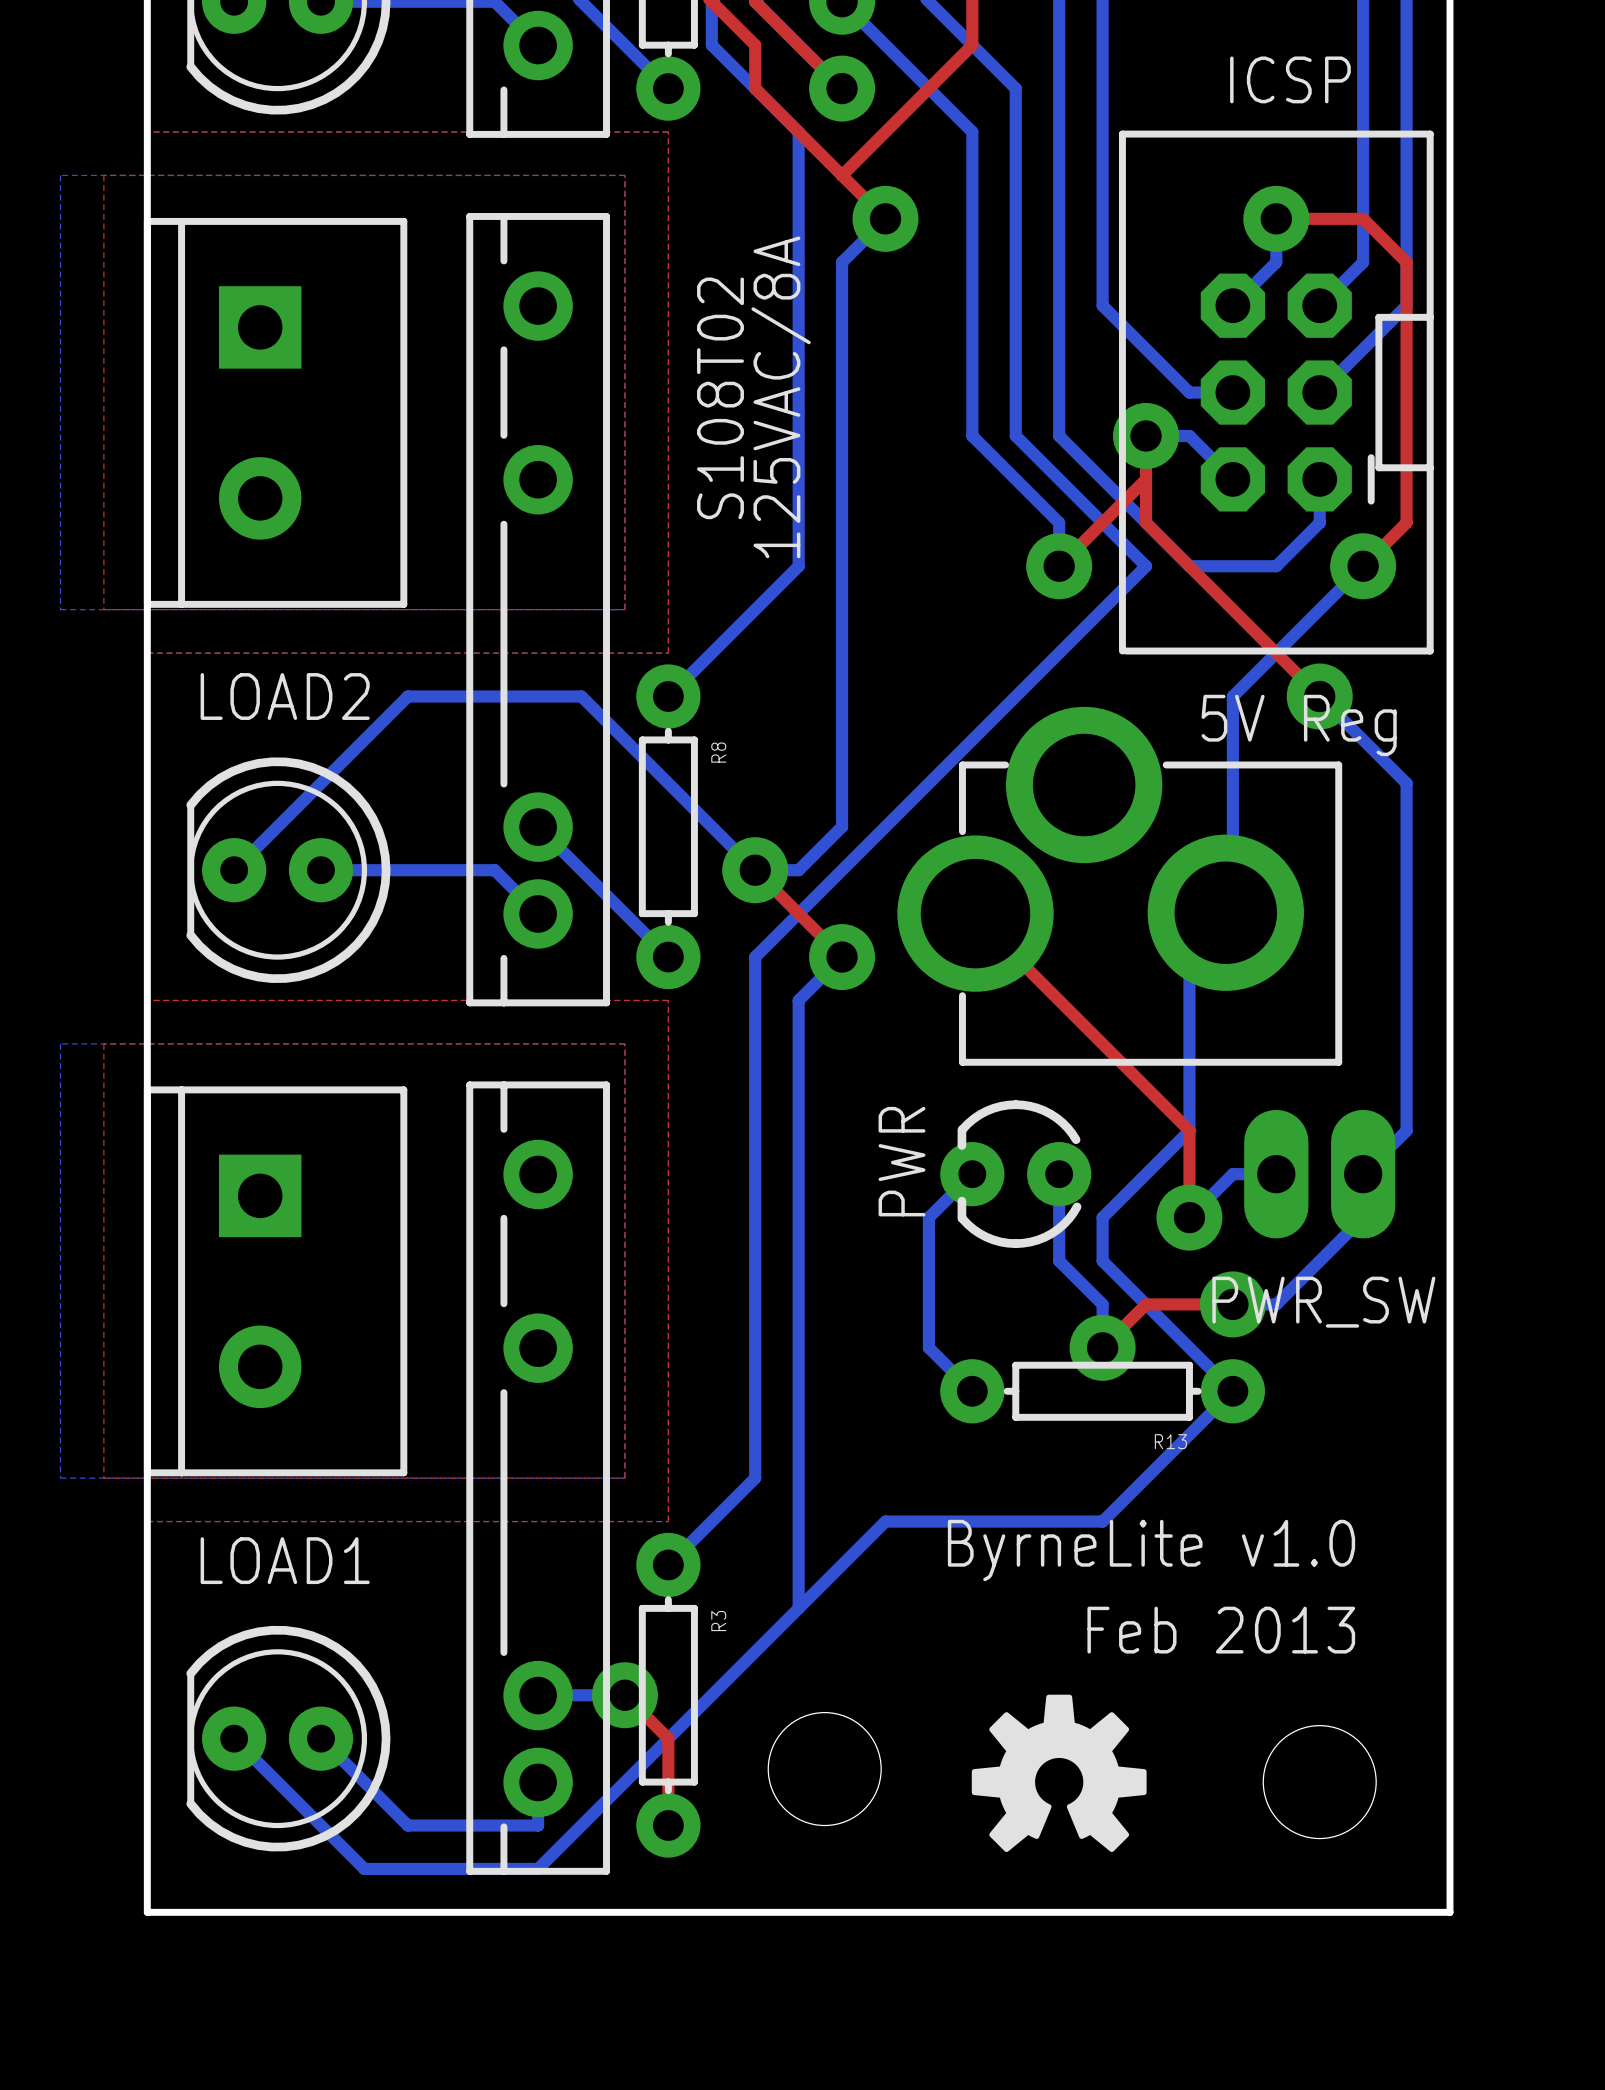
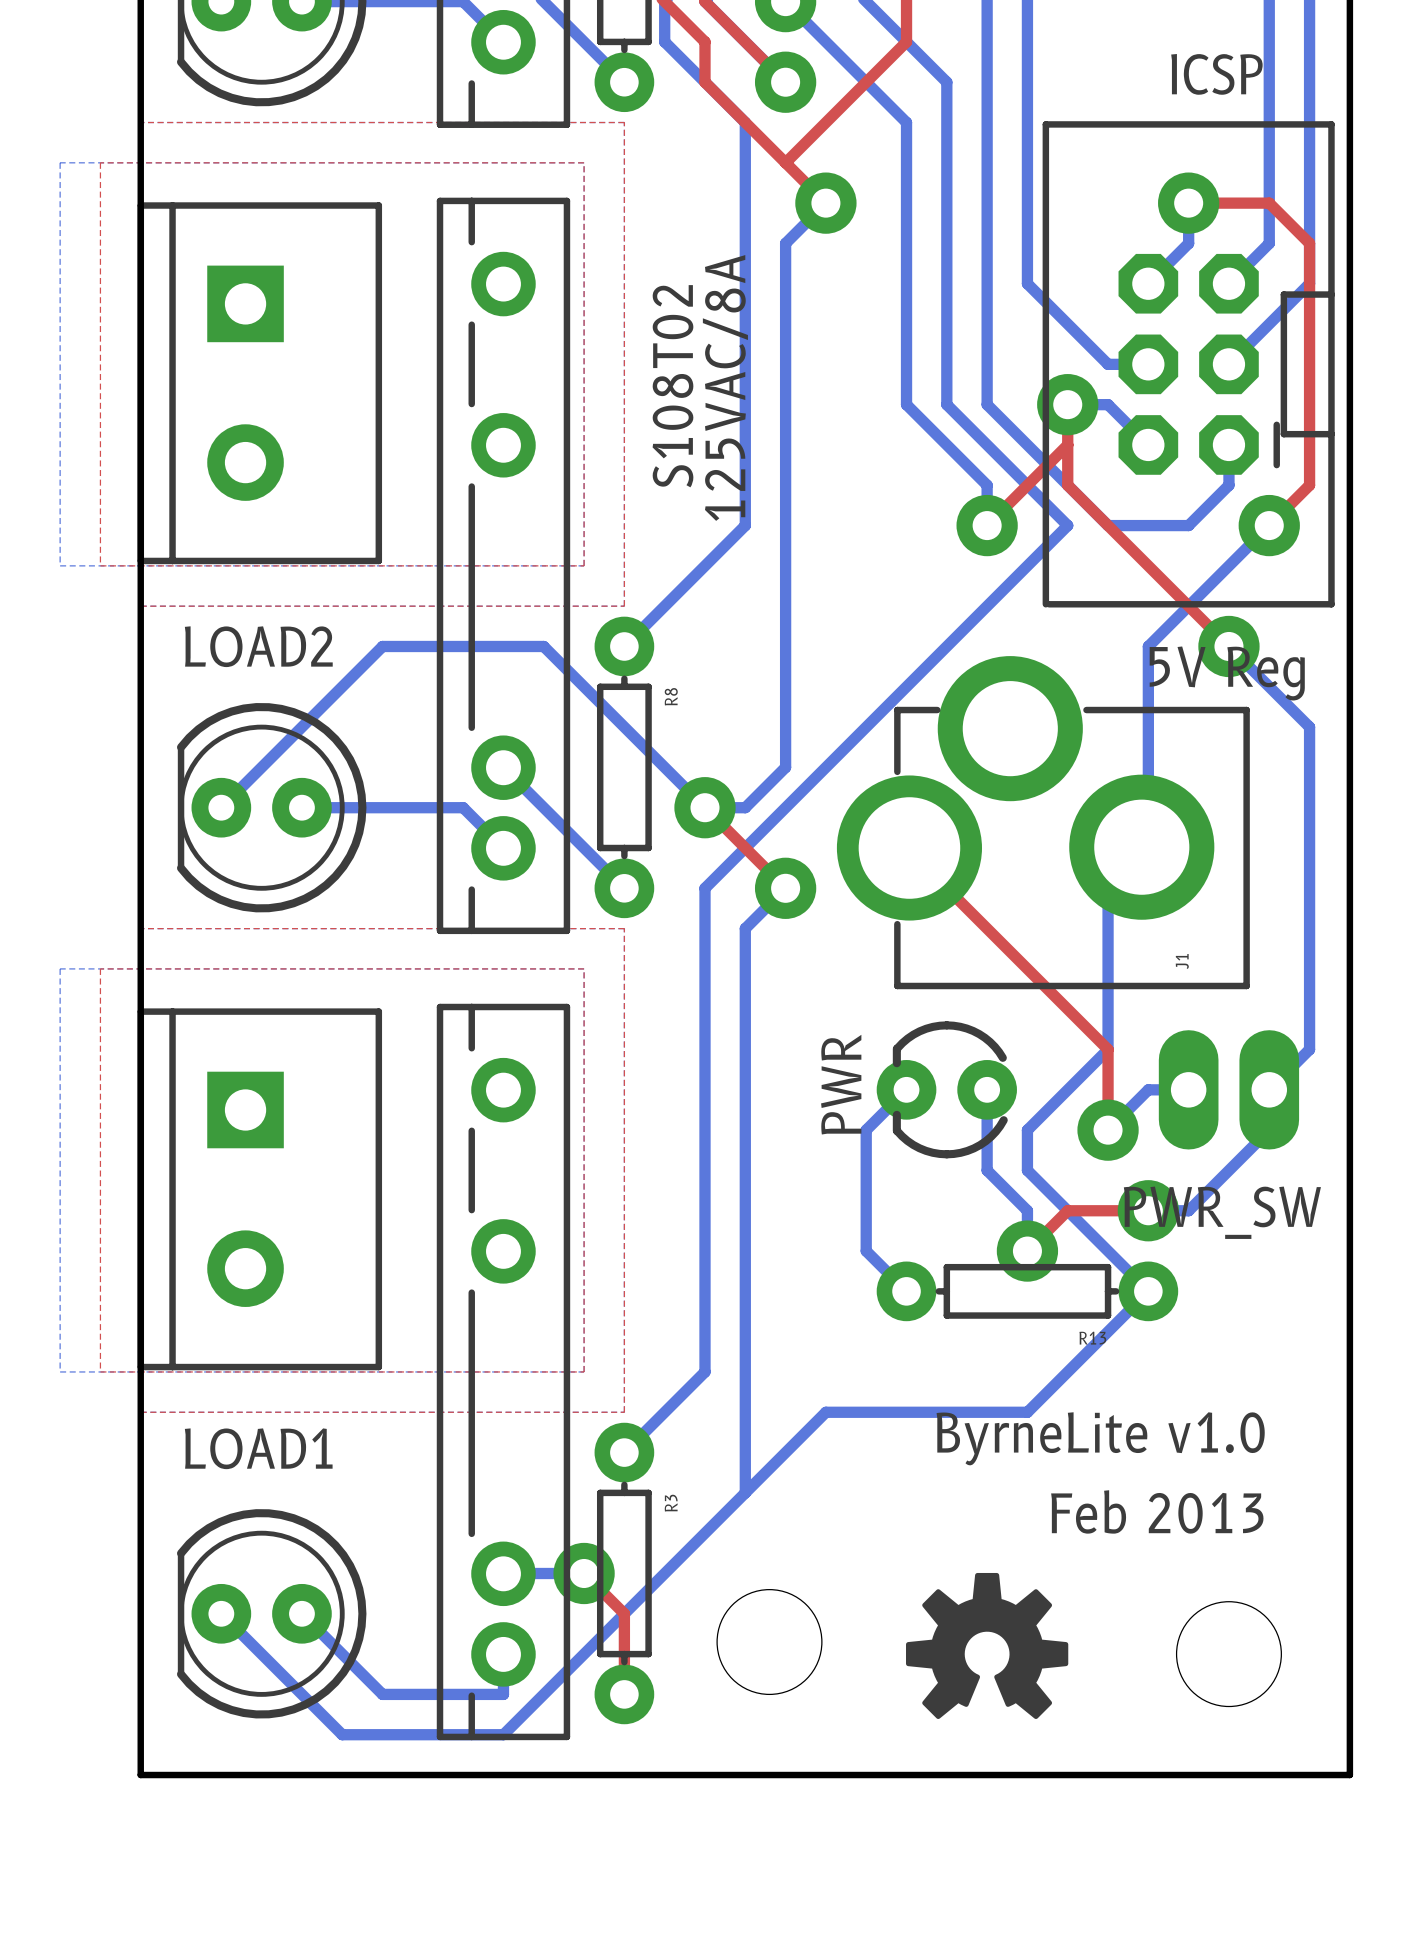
J1 name: none -> J1 (1182, 961)

